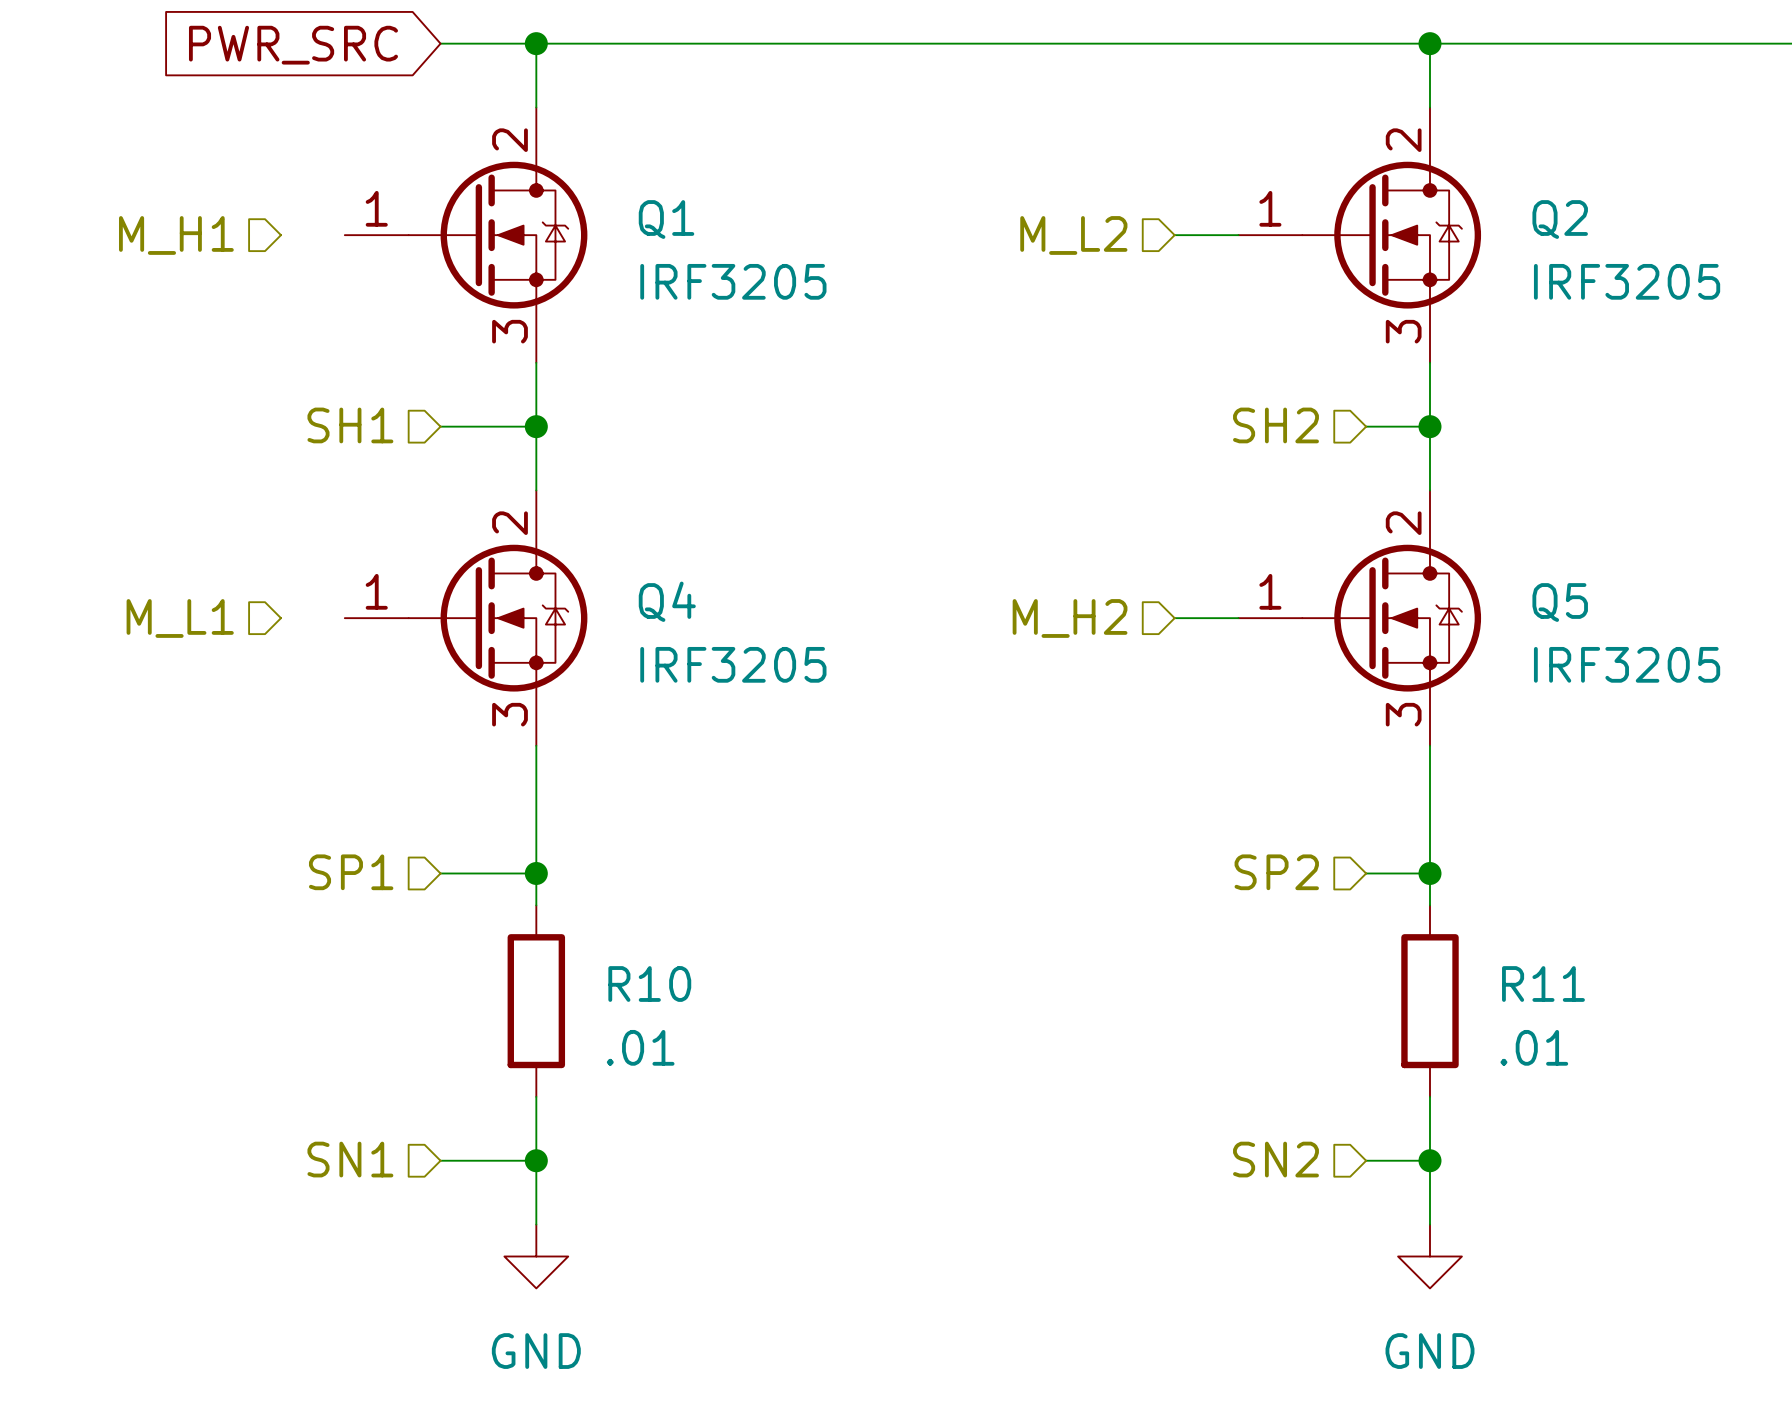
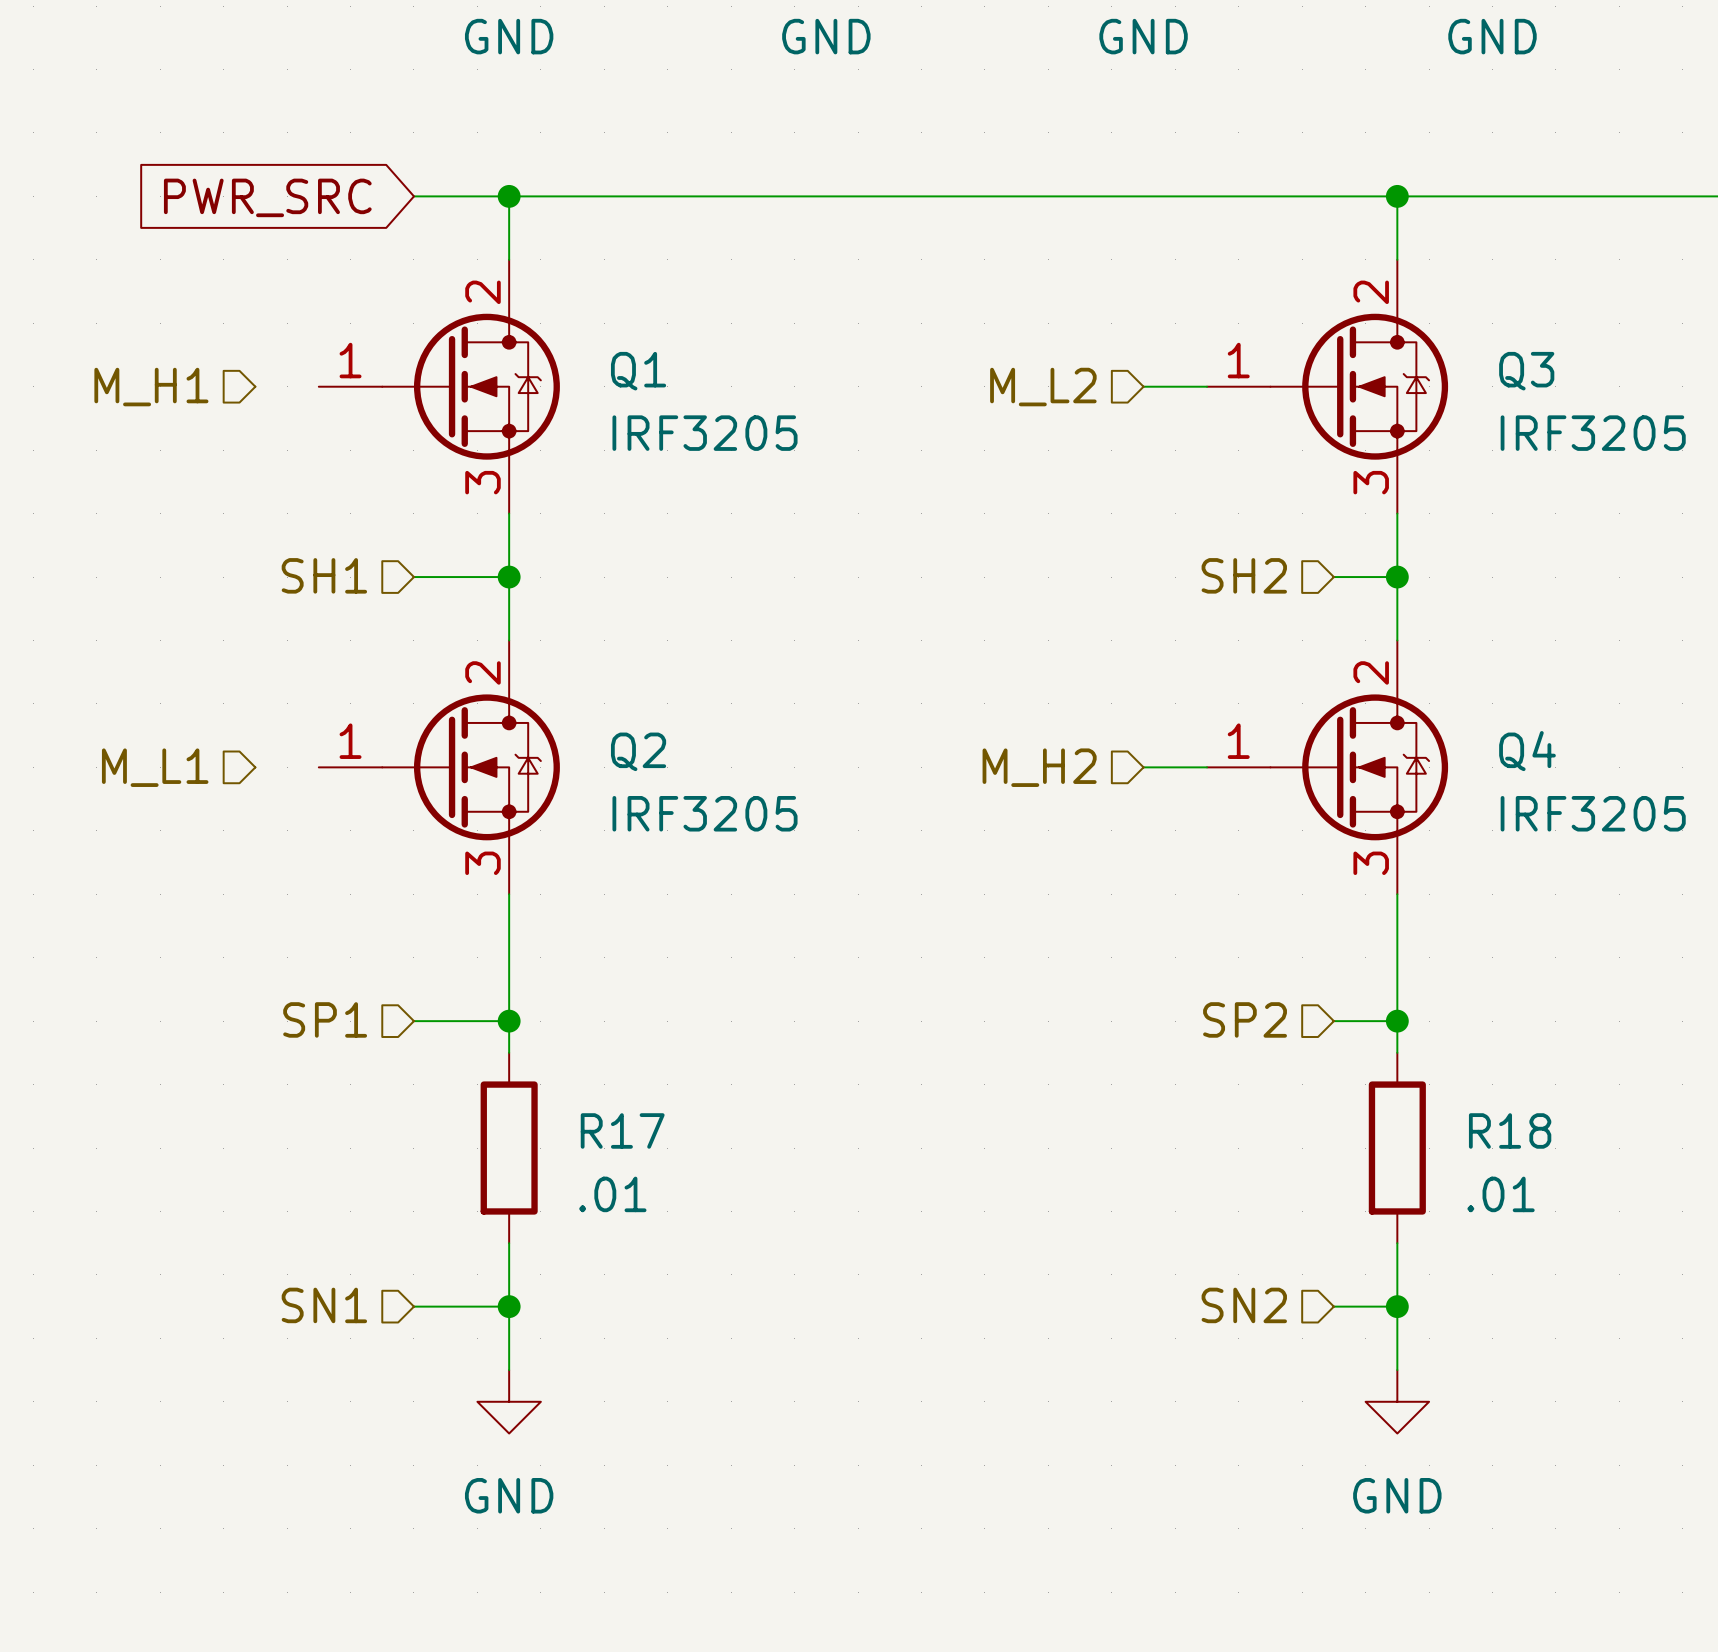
Q2 name: Q2 (1560, 219) -> Q3 (1526, 371)
Q4 name: Q4 (667, 601) -> Q2 (638, 751)
Q5 name: Q5 (1560, 602) -> Q4 (1527, 751)
R10 name: R10 (649, 984) -> R17 (622, 1130)
R11 name: R11 (1543, 984) -> R18 (1510, 1130)

